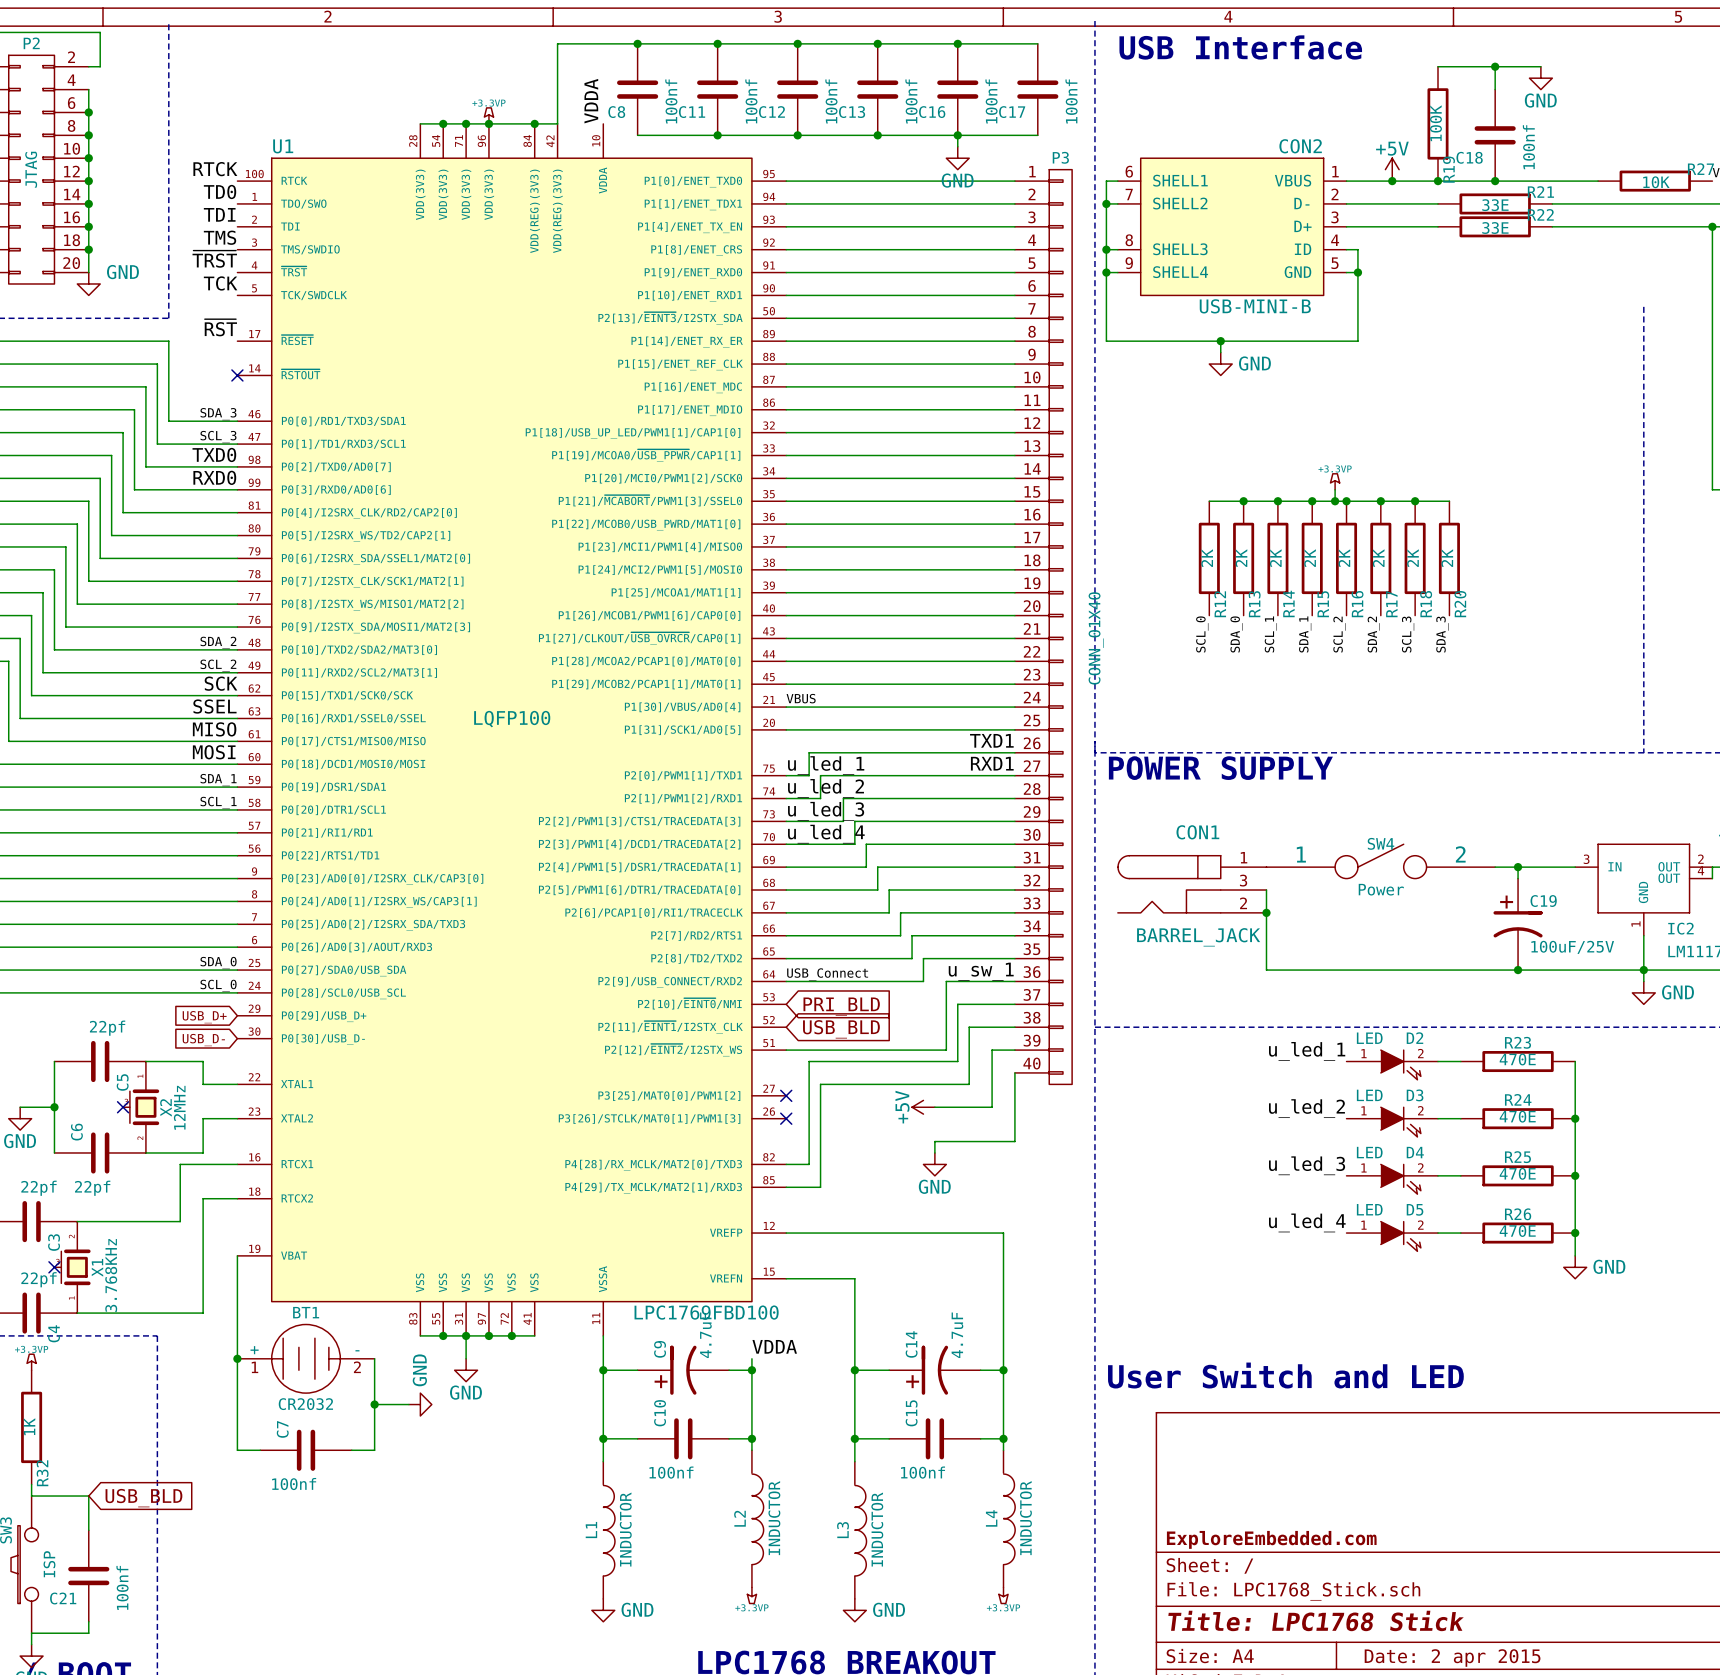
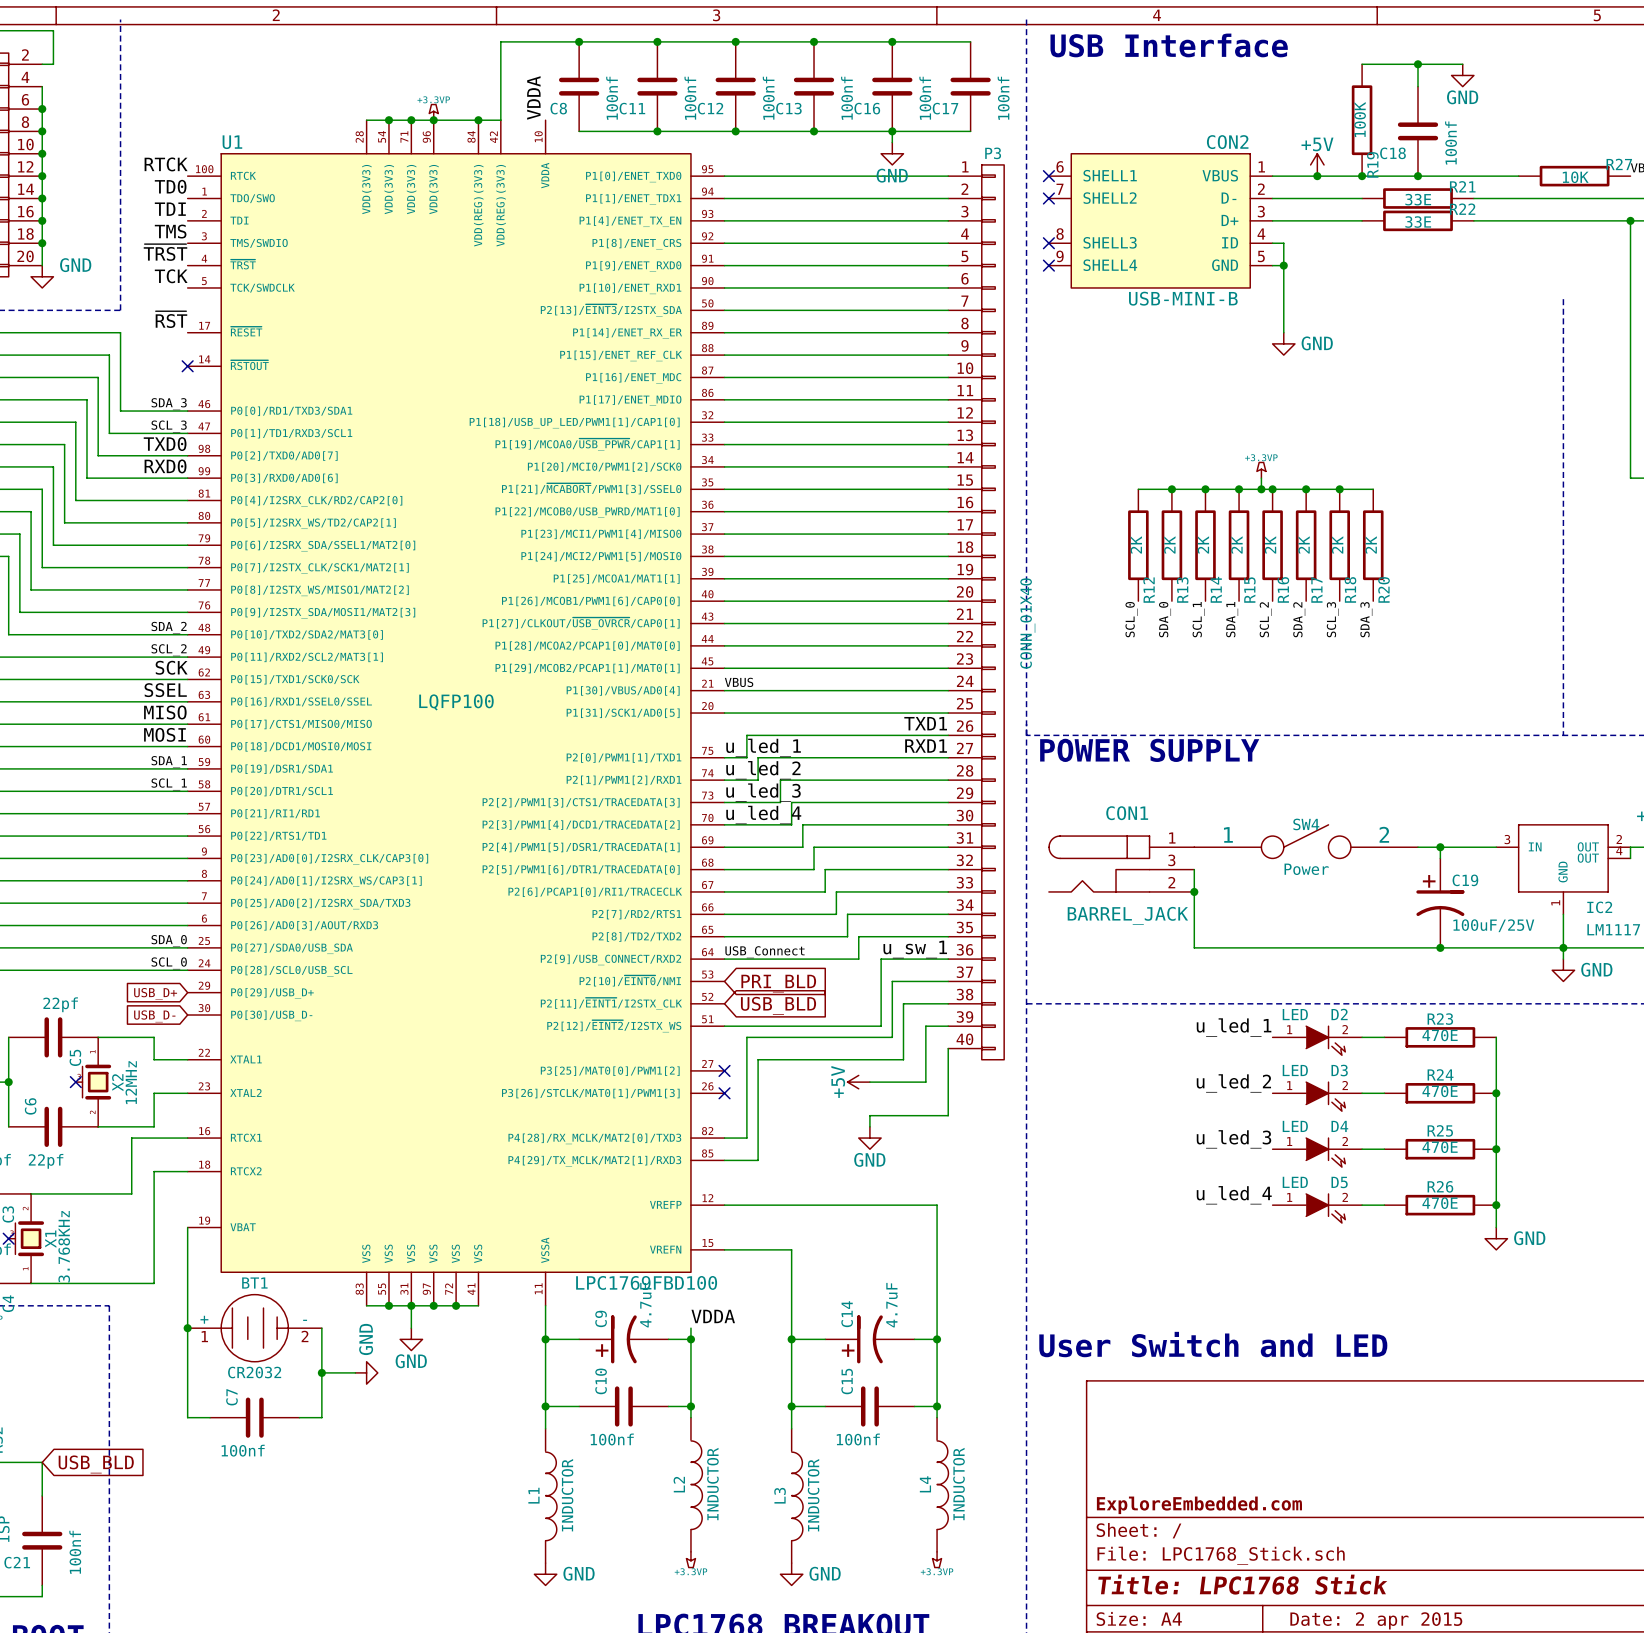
wire: (1117, 181) (1106, 181) (1106, 341) (1357, 341) -> none
no-connect mark: none -> (1048, 176)
wire: (1106, 203) (1117, 203) -> none
junction: (1106, 203) -> none
no-connect mark: none -> (1048, 198)
wire: (1106, 249) (1117, 249) -> none
junction: (1106, 249) -> none
no-connect mark: none -> (1048, 243)
wire: (1106, 272) (1117, 272) -> none
junction: (1106, 272) -> none
no-connect mark: none -> (1048, 265)
wire: (1220, 341) (1220, 352) -> none
junction: (1220, 341) -> none
power symbol position: GND (1220, 364) -> GND (1283, 343)

